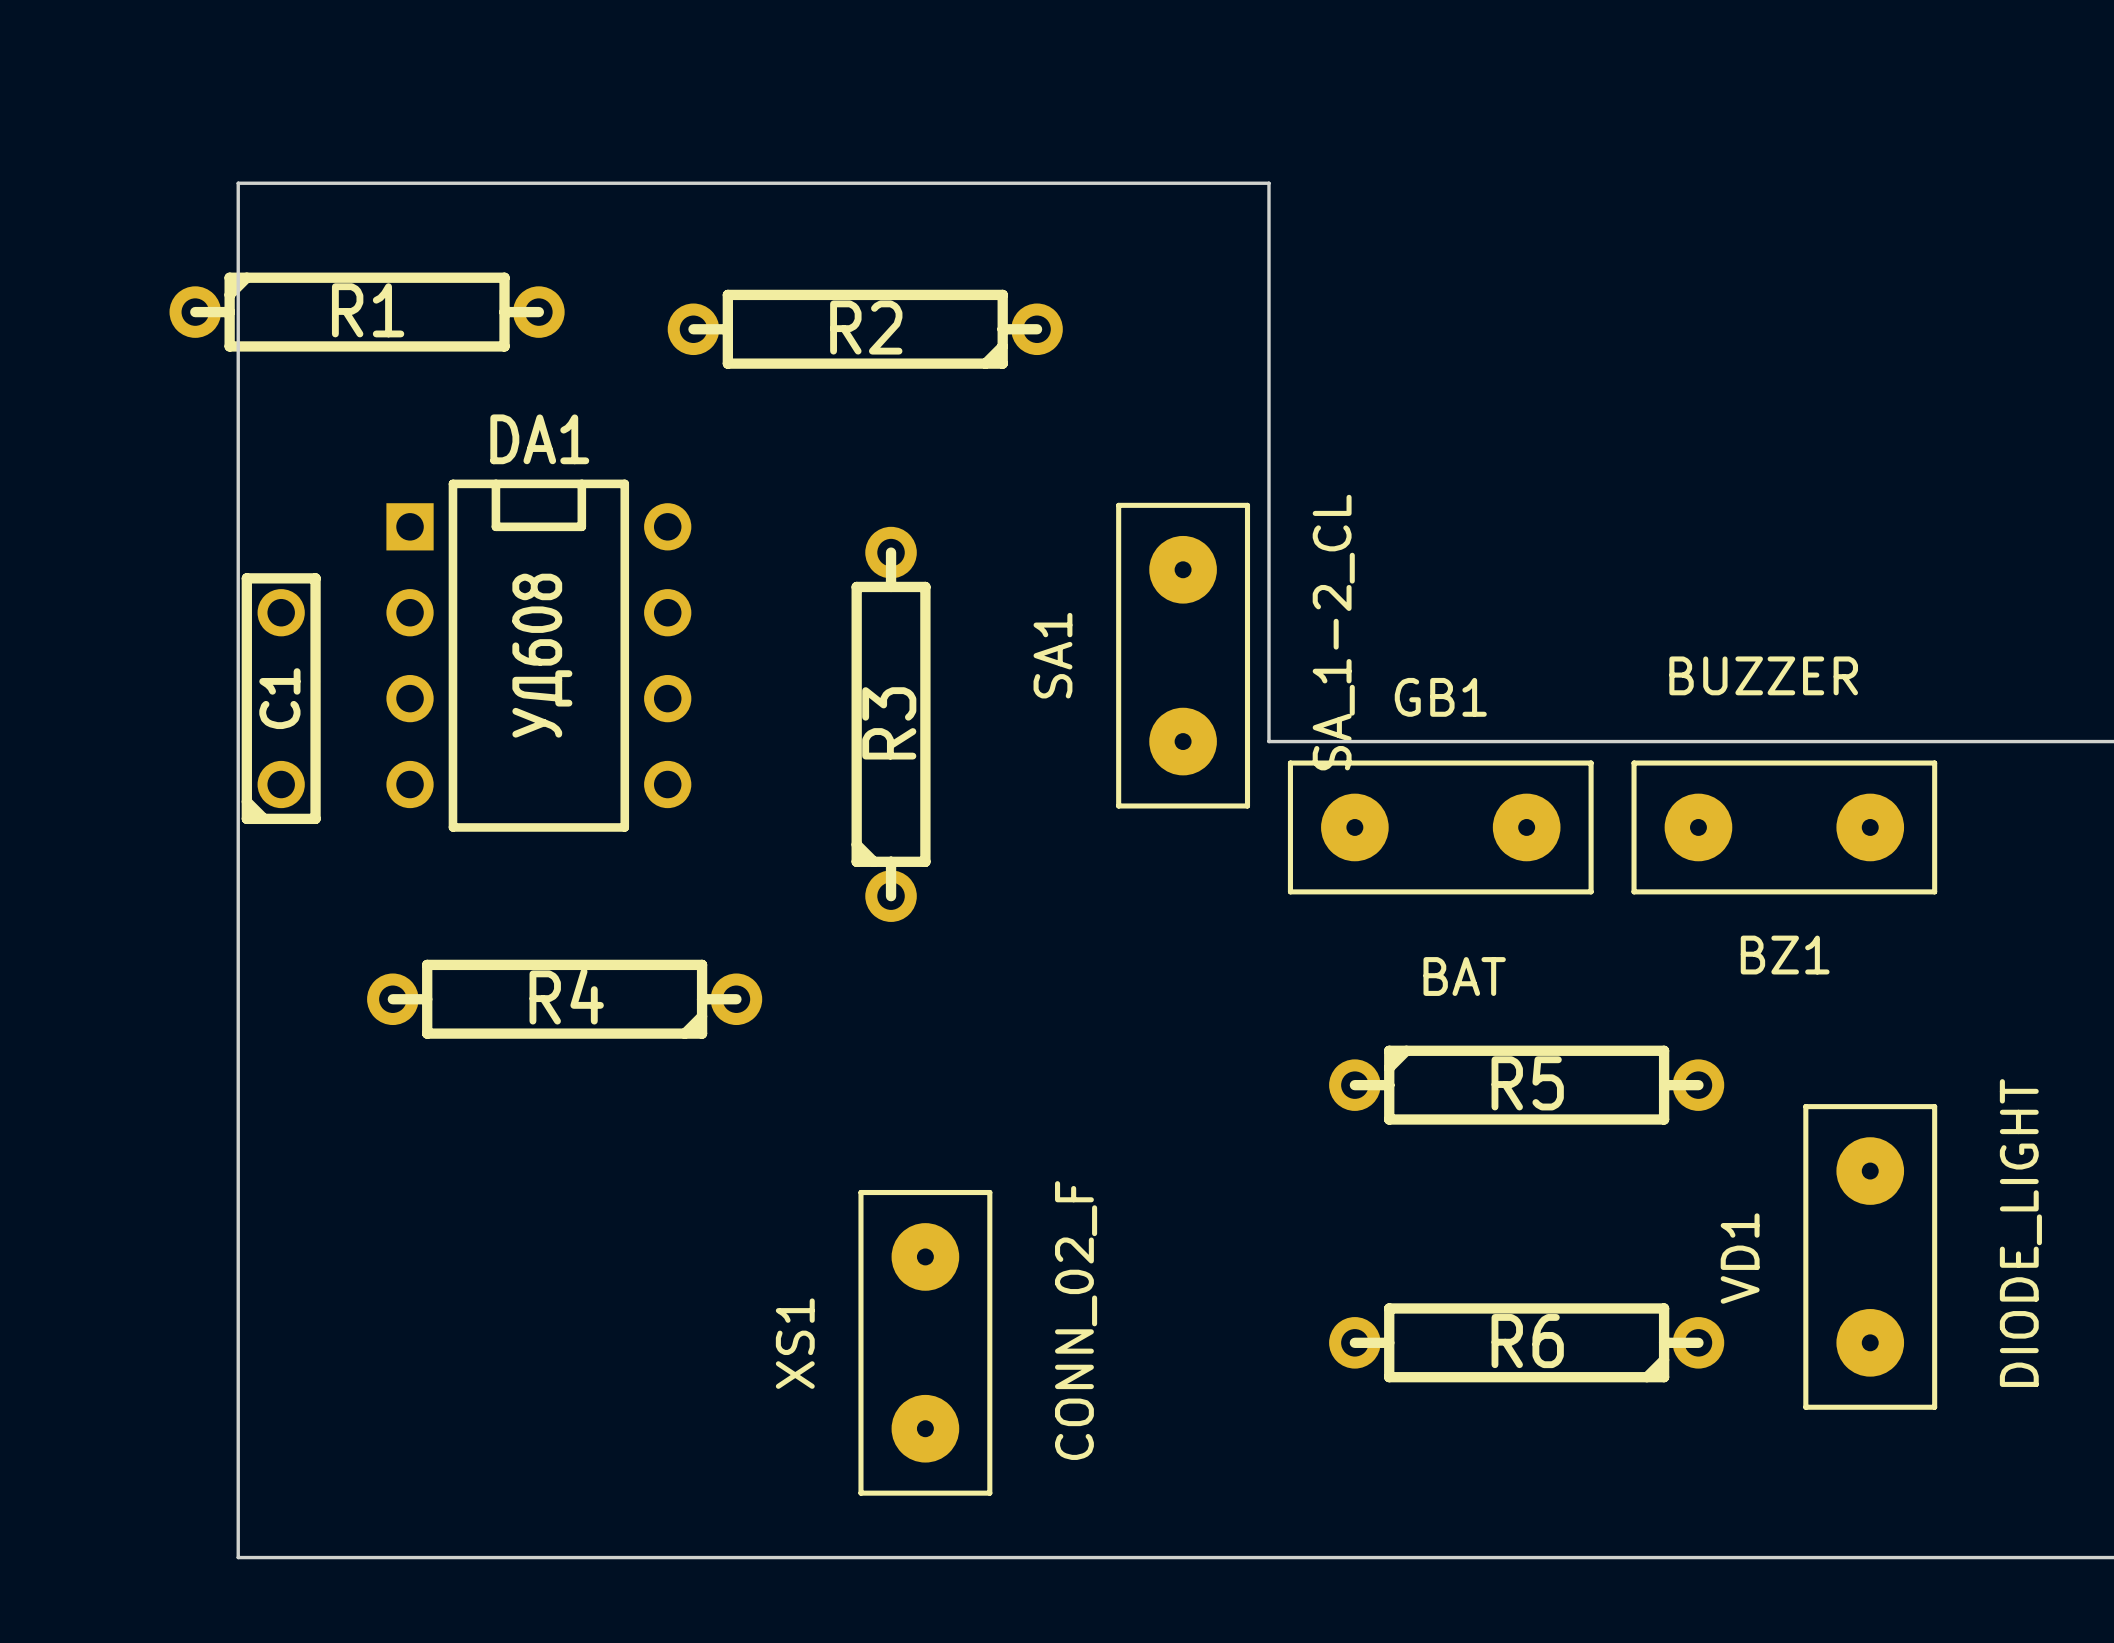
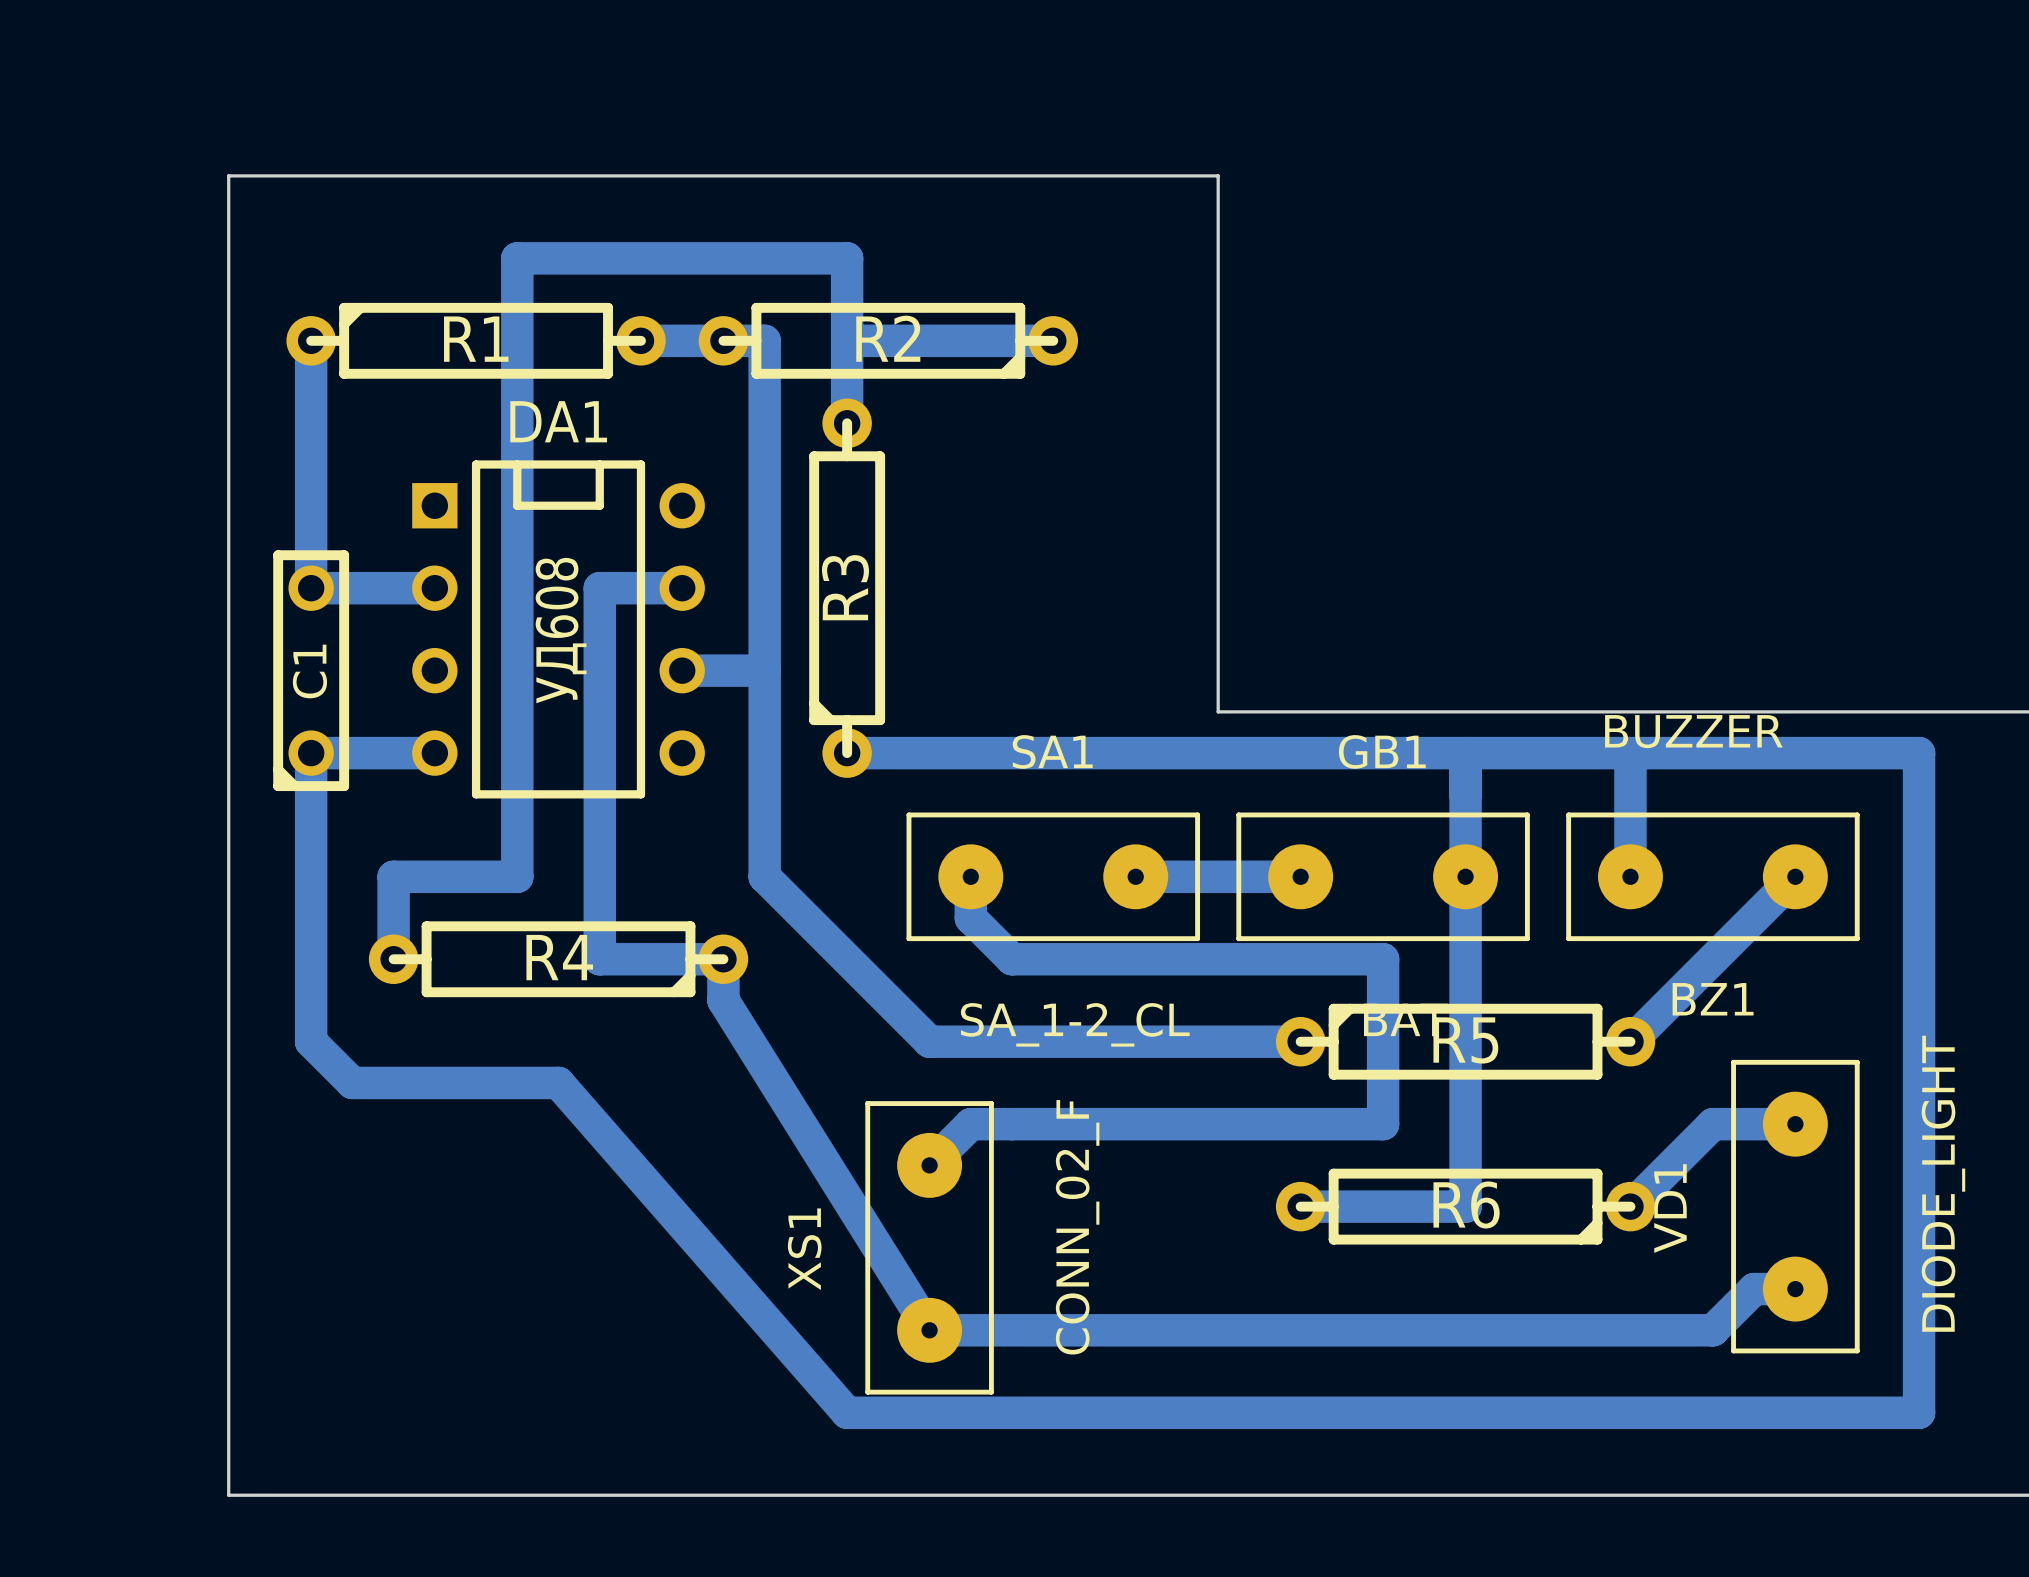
R1 position: (367, 312) -> (476, 340)
R2 position: (865, 329) -> (888, 340)
bottom track: none -> (311, 340) (311, 588) (434, 588)
bottom track: none -> (640, 340) (764, 340) (764, 876) (929, 1041) (1300, 1041)
bottom track: none -> (847, 340) (1053, 340)
bottom track: none -> (847, 423) (847, 258) (517, 258) (517, 876) (393, 876) (393, 959)
bottom track: none -> (682, 588) (599, 588) (599, 959) (723, 959) (723, 1000) (929, 1330) (1712, 1330) (1754, 1289) (1795, 1289)
DA1 position: (538, 655) -> (558, 629)
SA1 rotation: 0° (1183, 655) -> 90° clockwise (1053, 876)
SA1 position: (1183, 655) -> (1053, 876)
C1 position: (281, 698) -> (311, 670)
bottom track: none -> (682, 670) (764, 670)
R3 position: (891, 724) -> (847, 588)
bottom track: none -> (434, 753) (311, 753) (311, 1041) (352, 1082) (558, 1082) (847, 1412) (1919, 1412) (1919, 753) (847, 753)
bottom track: none -> (1465, 753) (1465, 1206) (1300, 1206)
bottom track: none -> (1630, 753) (1630, 876)
GB1 position: (1440, 827) -> (1383, 876)
BZ1 position: (1784, 827) -> (1712, 876)
bottom track: none -> (970, 876) (970, 918) (1012, 959) (1383, 959) (1383, 1124) (970, 1124) (929, 1165)
bottom track: none -> (1135, 876) (1300, 876)
bottom track: none -> (1795, 876) (1630, 1041)
R4 position: (564, 999) -> (558, 959)
bottom track: none -> (1795, 1124) (1712, 1124) (1630, 1206)
XS1 position: (925, 1342) -> (929, 1247)
R6 position: (1526, 1342) -> (1465, 1206)

